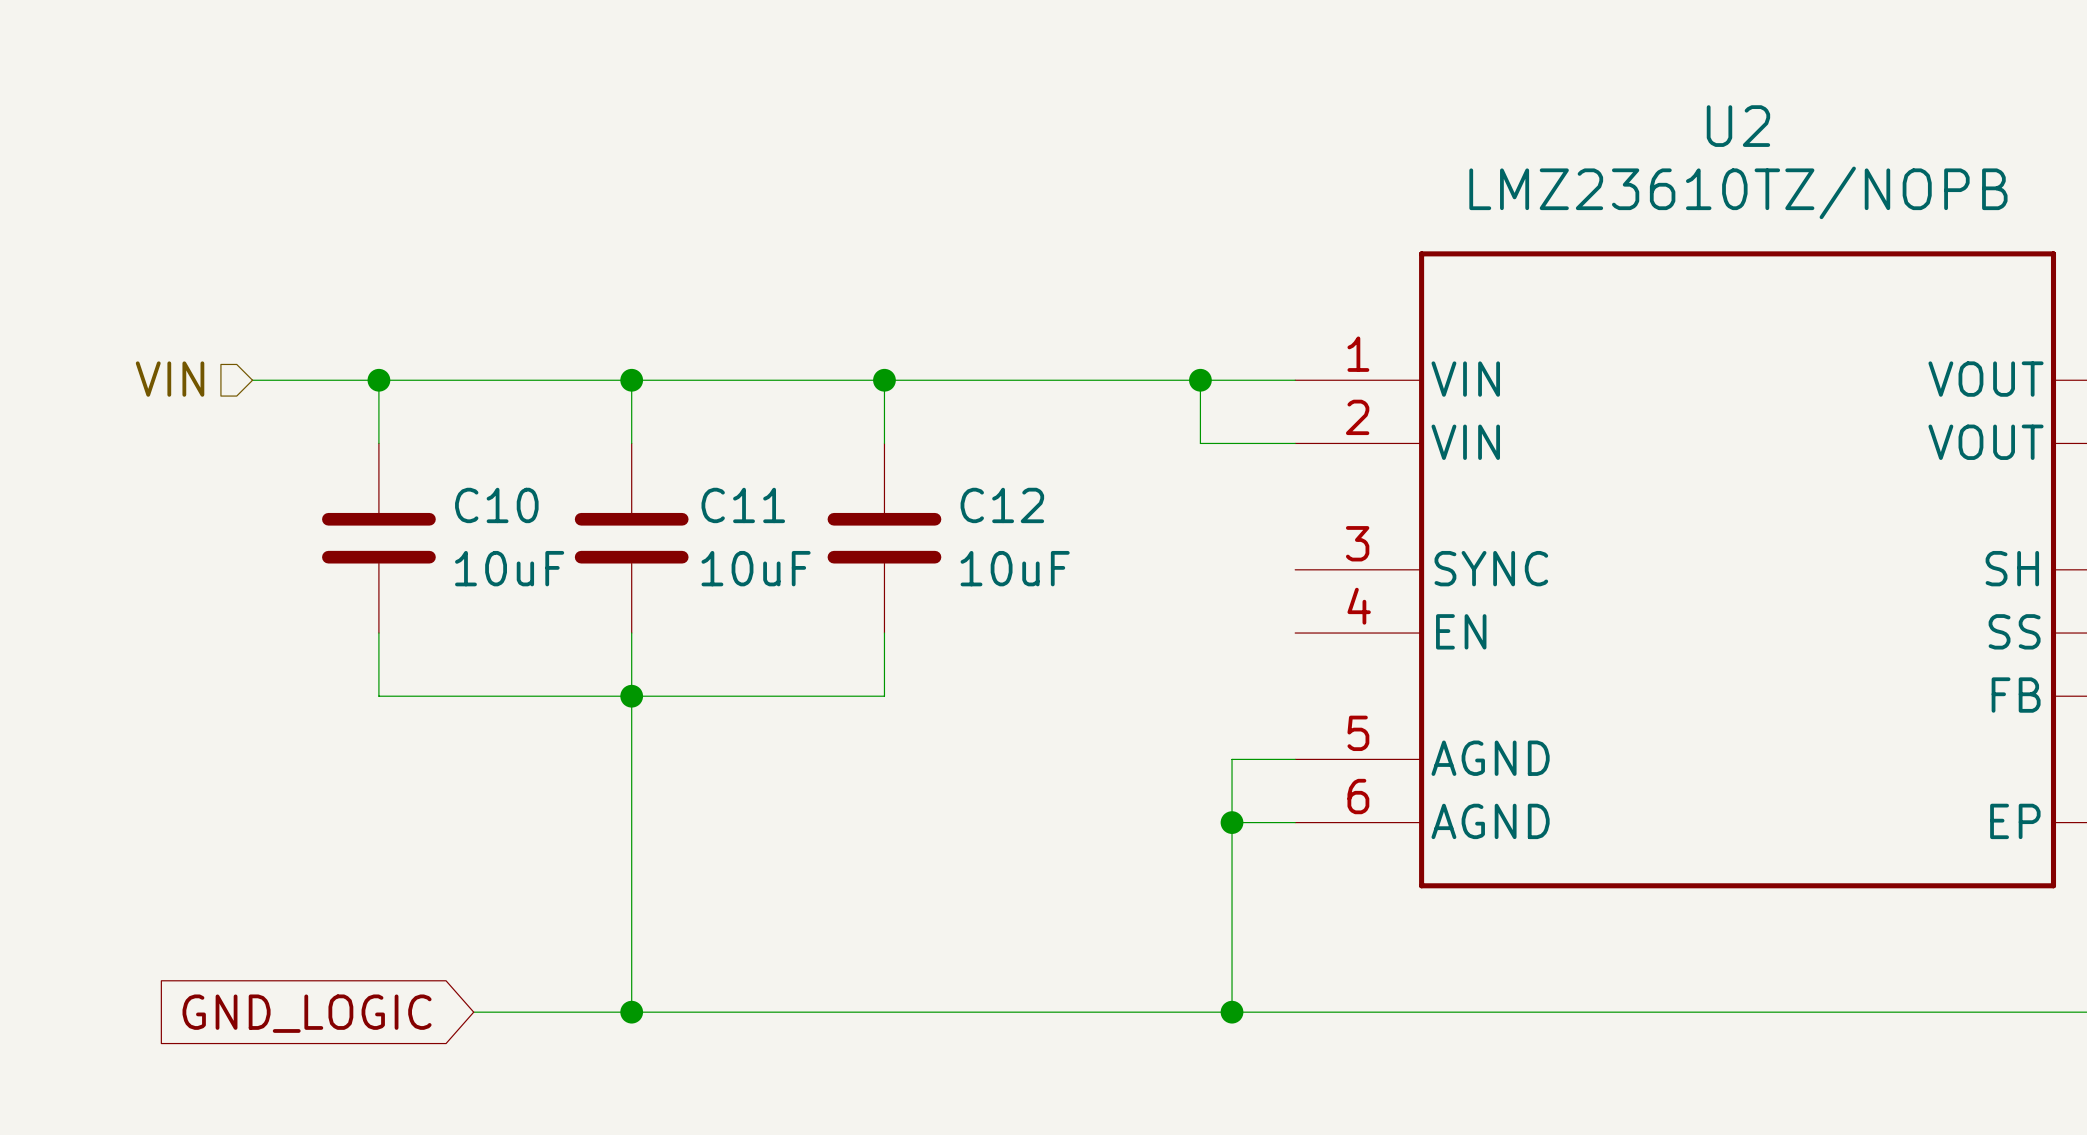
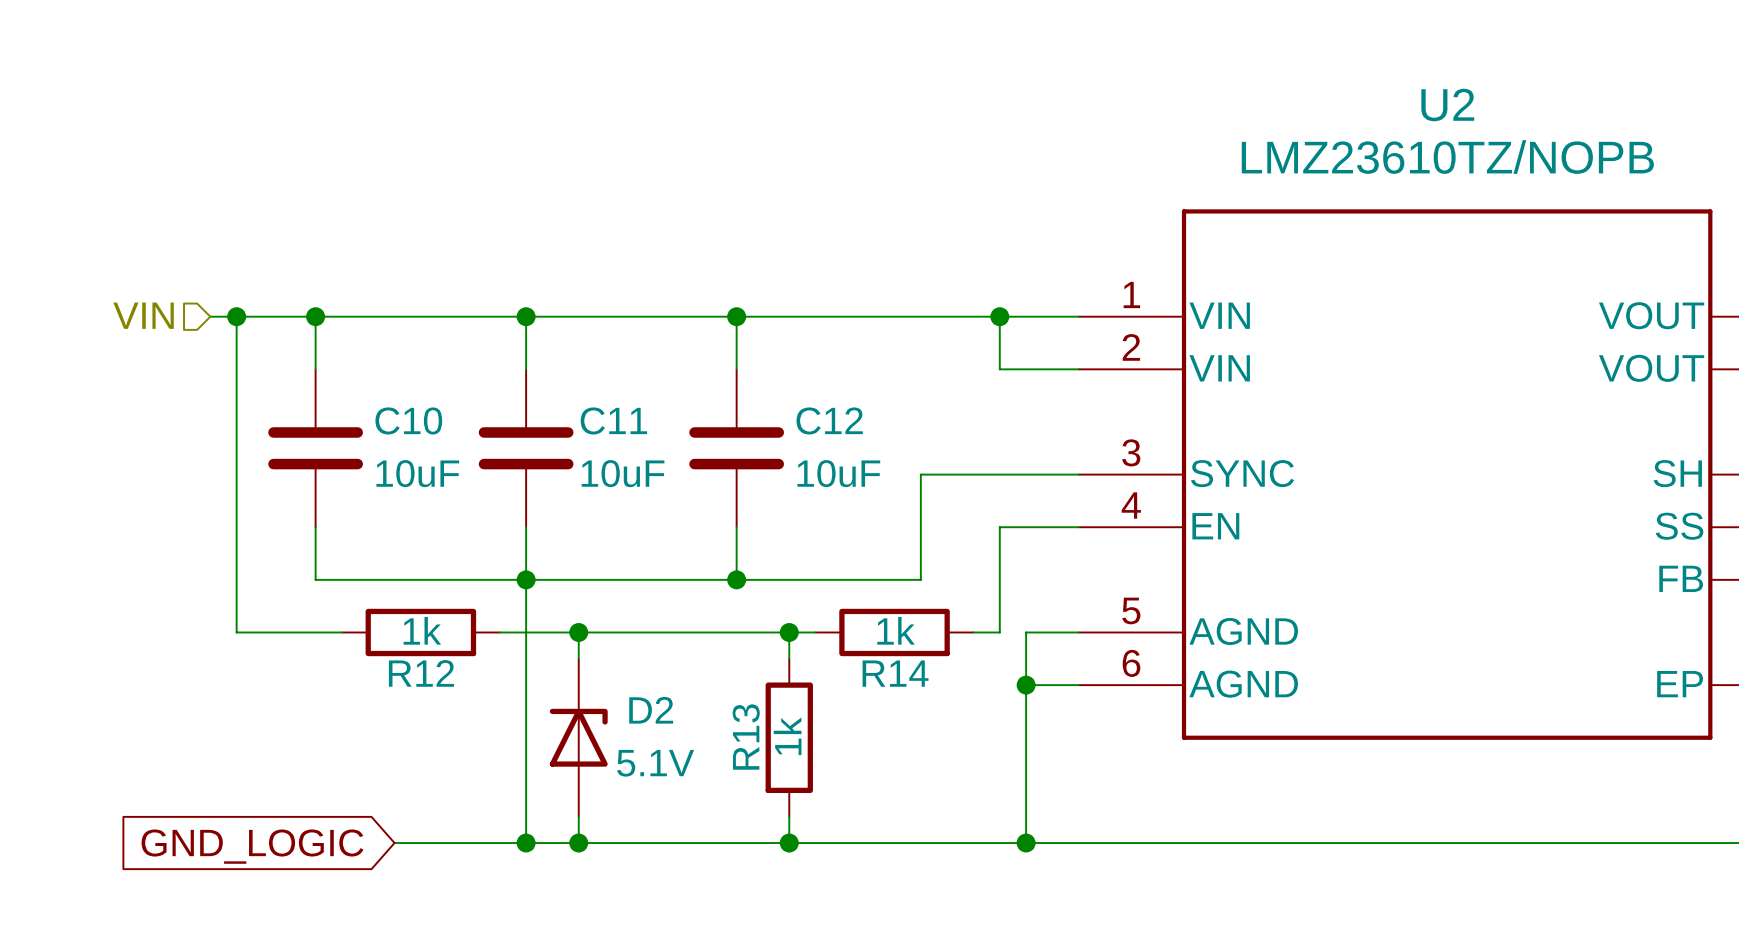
wire: none -> (236, 316) (236, 632) (341, 632)
junction: none -> (236, 316)
wire: none -> (1078, 474) (920, 474) (920, 579) (736, 579)
wire: none -> (1078, 527) (999, 527) (999, 632) (973, 632)
junction: none -> (736, 579)
R12: none -> 1k (420, 632)
wire: none -> (499, 632) (815, 632)
wire: none -> (578, 632) (578, 658)
junction: none -> (578, 632)
wire: none -> (789, 632) (789, 658)
junction: none -> (789, 632)
R14: none -> 1k (894, 632)
D2: none -> 5.1V (578, 737)
R13: none -> 1k (789, 737)
wire: none -> (578, 816) (578, 843)
wire: none -> (789, 816) (789, 843)
junction: none -> (578, 843)
junction: none -> (789, 843)

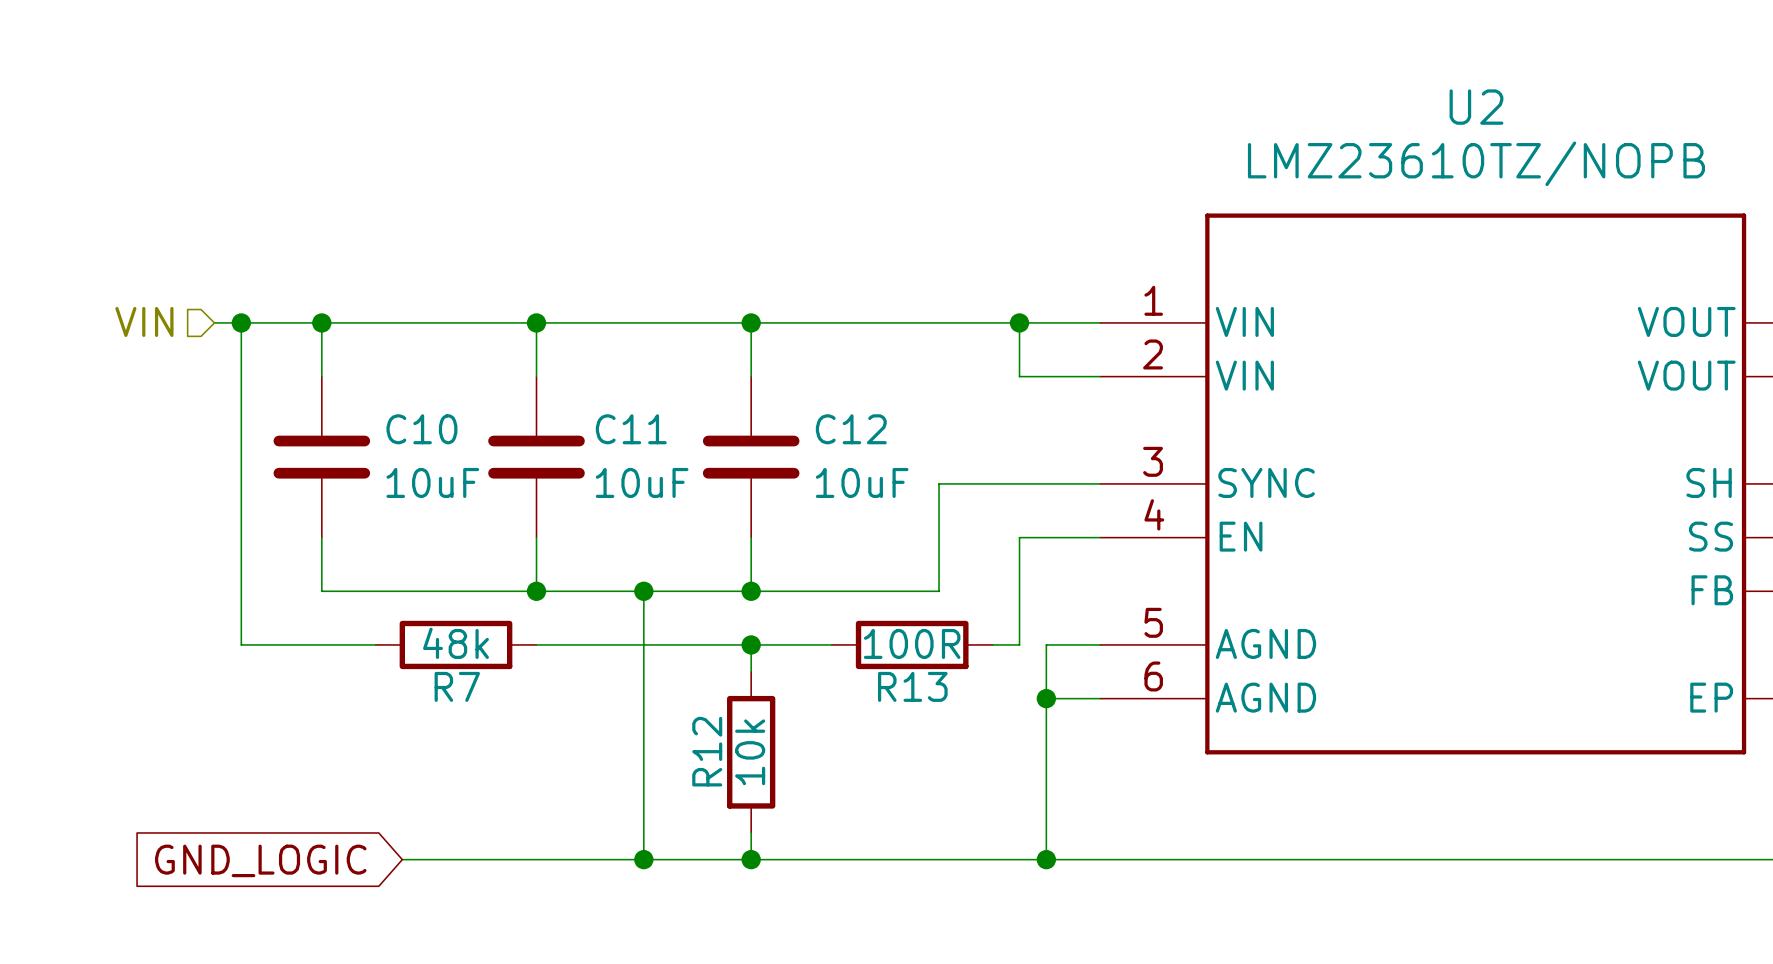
wire: (526, 579) (526, 843) -> (643, 591) (643, 859)
R12 value: 1k (422, 630) -> 10k (750, 752)
R14 value: 1k (896, 630) -> 100R (912, 643)
R12 rotation: 0° (420, 632) -> 90° clockwise (751, 752)
R12 position: (420, 632) -> (751, 752)
R7: none -> 48k (455, 644)
wire: (578, 632) (578, 658) -> none
junction position: (578, 632) -> (643, 591)
wire: (789, 632) (789, 658) -> (751, 644) (751, 671)
junction position: (789, 632) -> (751, 644)
R14 name: R14 (895, 673) -> R13 (912, 686)
D2: 5.1V (578, 737) -> none
R13: 1k (789, 737) -> none
wire: (578, 816) (578, 843) -> none
wire: (789, 816) (789, 843) -> (751, 832) (751, 859)
junction: (526, 843) -> none
junction: (578, 843) -> none
junction: none -> (643, 859)
junction position: (789, 843) -> (751, 859)

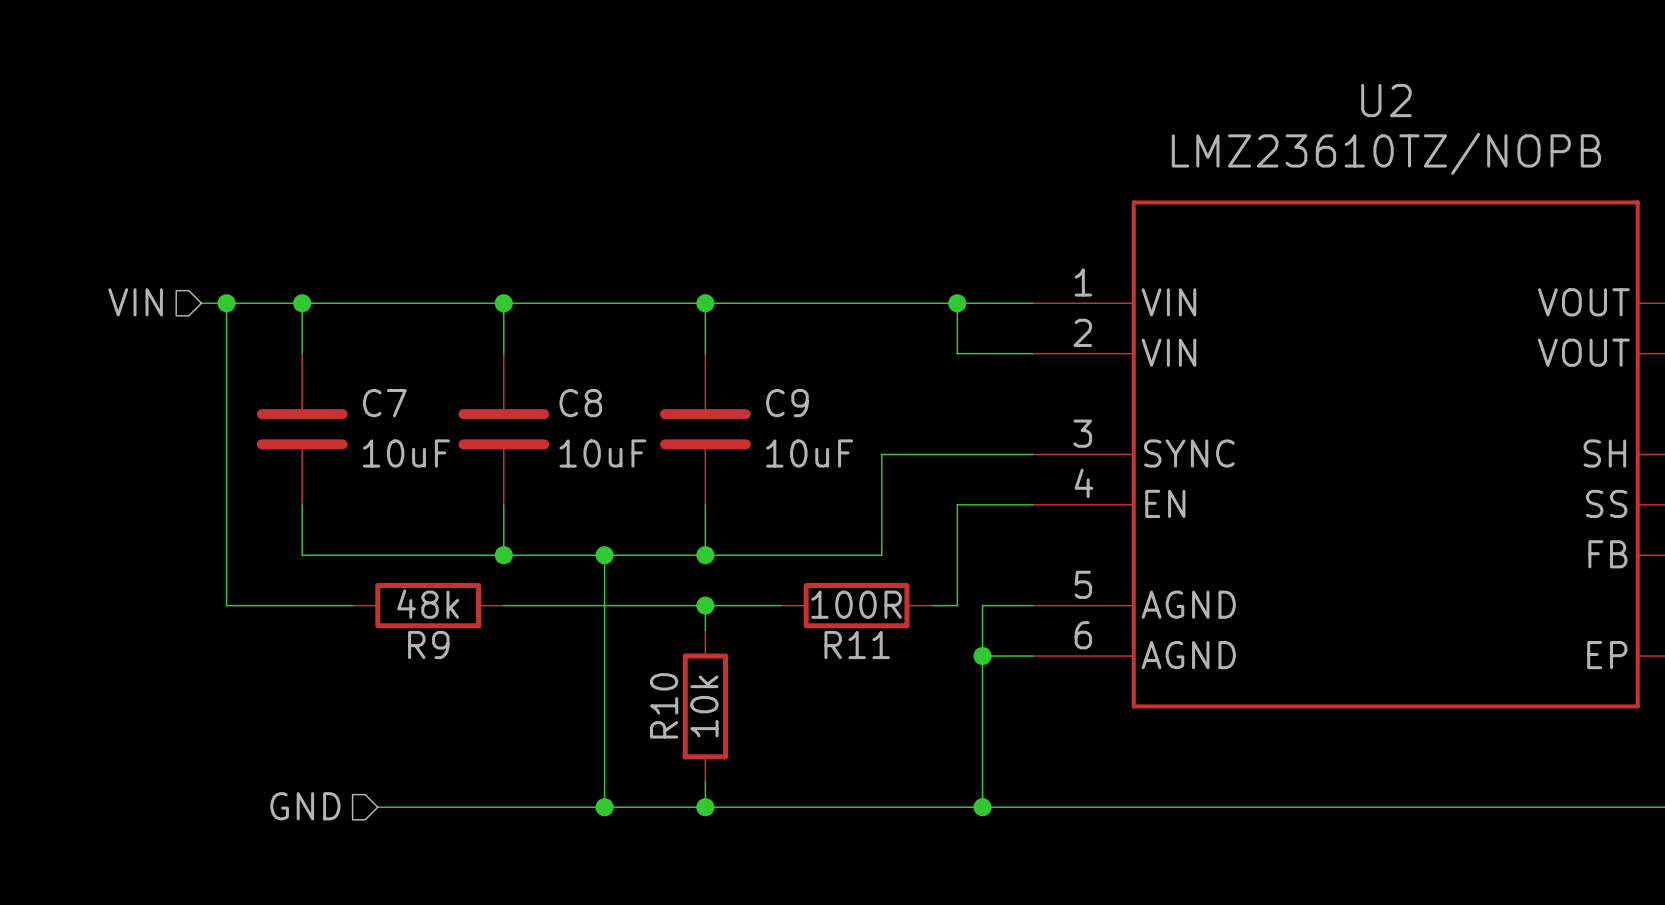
C10 name: C10 (421, 429) -> C7 (384, 403)
C11 name: C11 (631, 429) -> C8 (580, 403)
C12 name: C12 (851, 429) -> C9 (787, 403)
R7 name: R7 (457, 686) -> R9 (428, 645)
R13 name: R13 (912, 686) -> R11 (857, 645)
R12 name: R12 (707, 751) -> R10 (664, 705)
hierarchical label: none -> GND (305, 806)
global label: GND_LOGIC (260, 860) -> none

